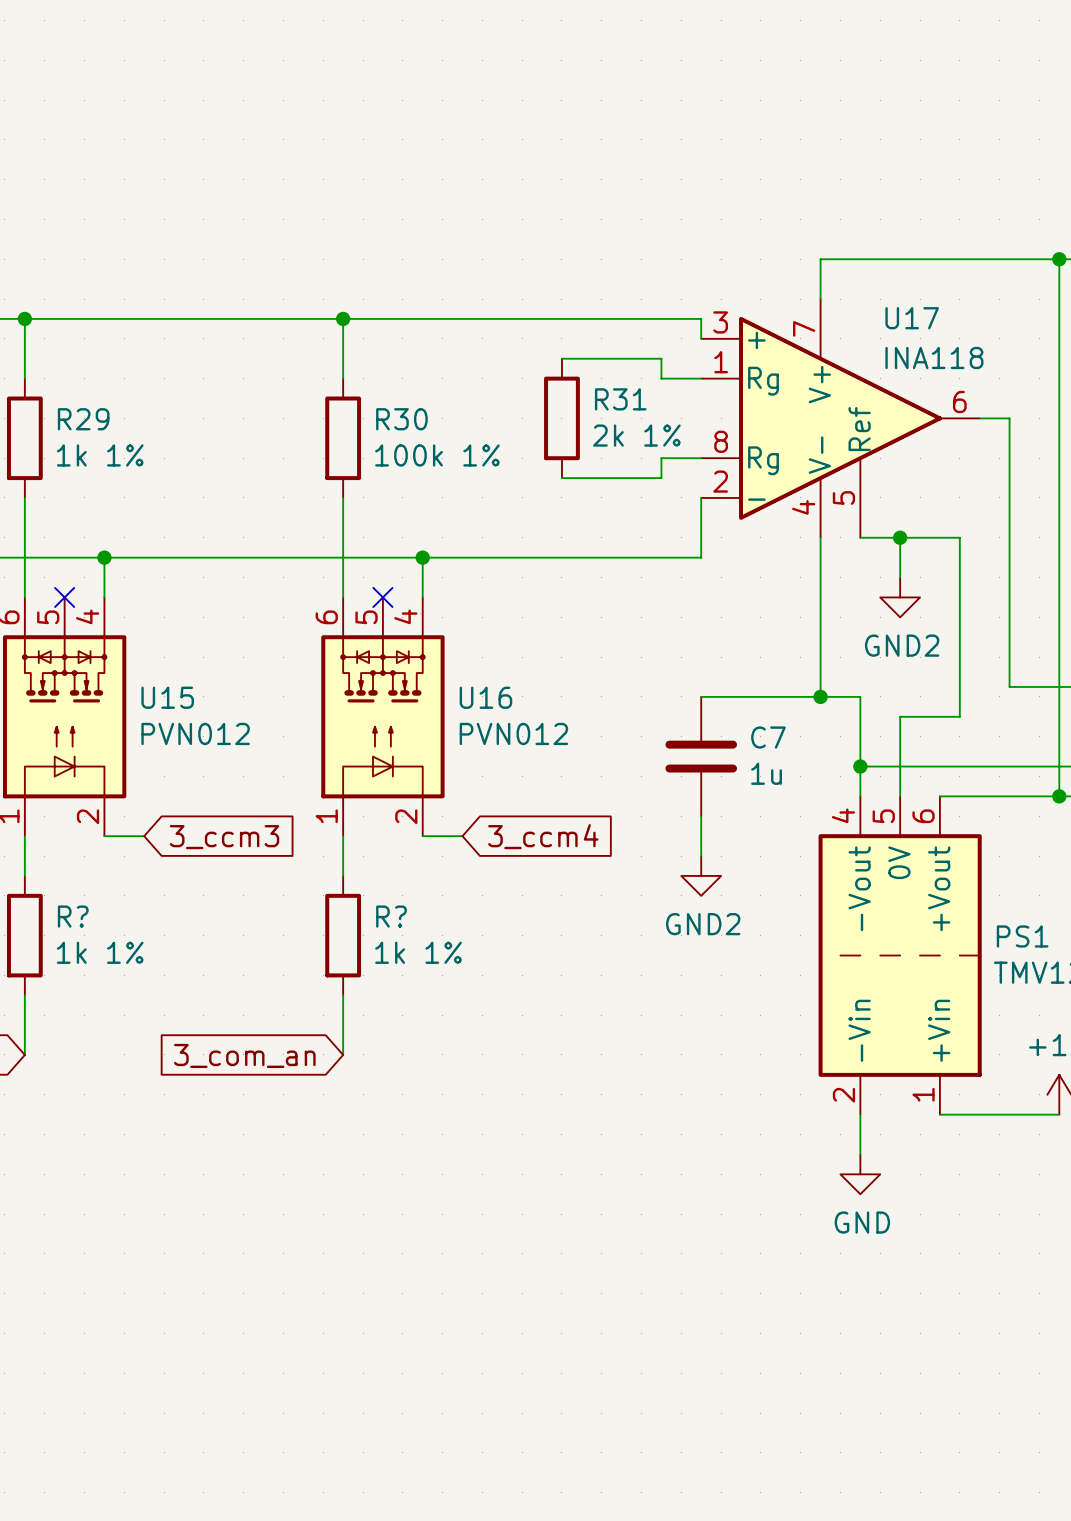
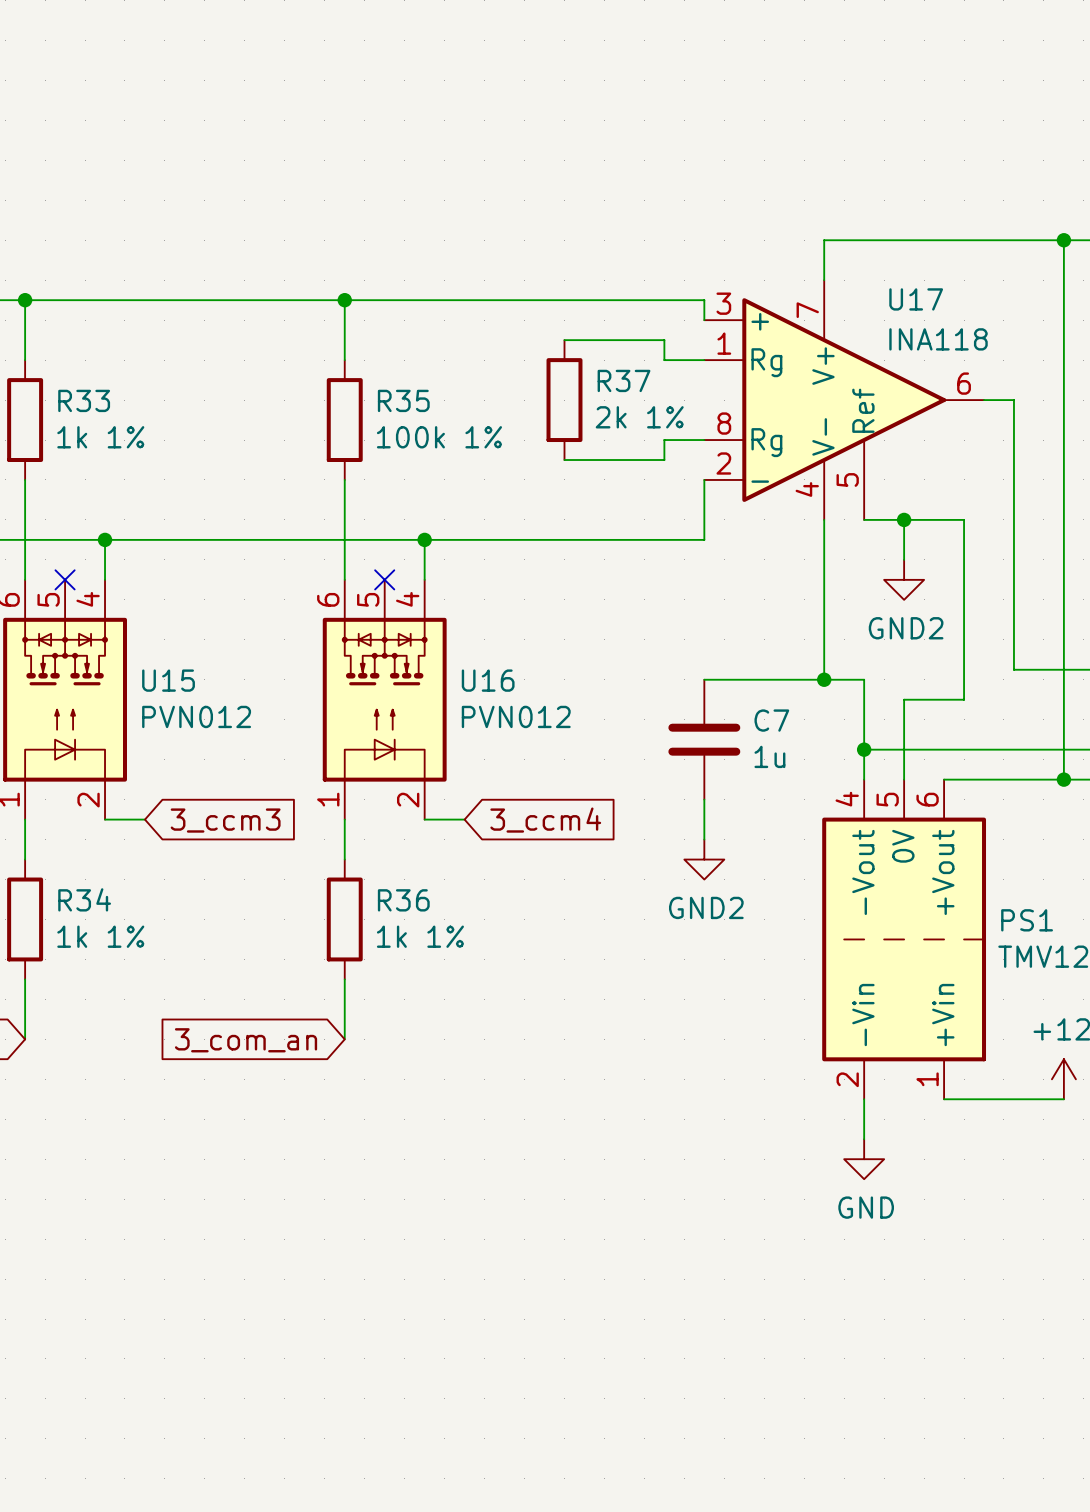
R31 name: R31 (620, 399) -> R37 (624, 380)
R29 name: R29 (83, 419) -> R33 (84, 400)
R30 name: R30 (401, 419) -> R35 (403, 400)
R? name: R? (73, 916) -> R34 (84, 899)
R? name: R? (391, 916) -> R36 (403, 900)

